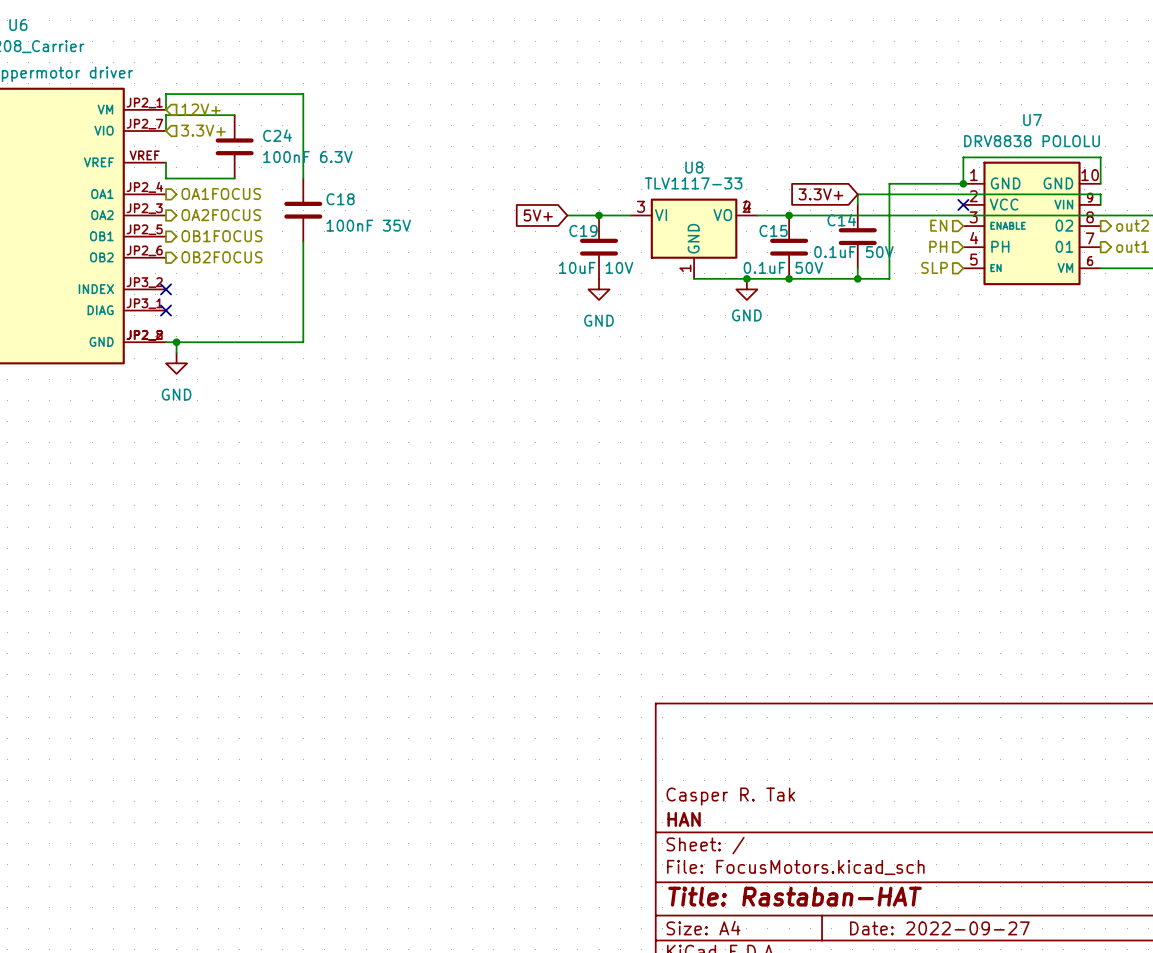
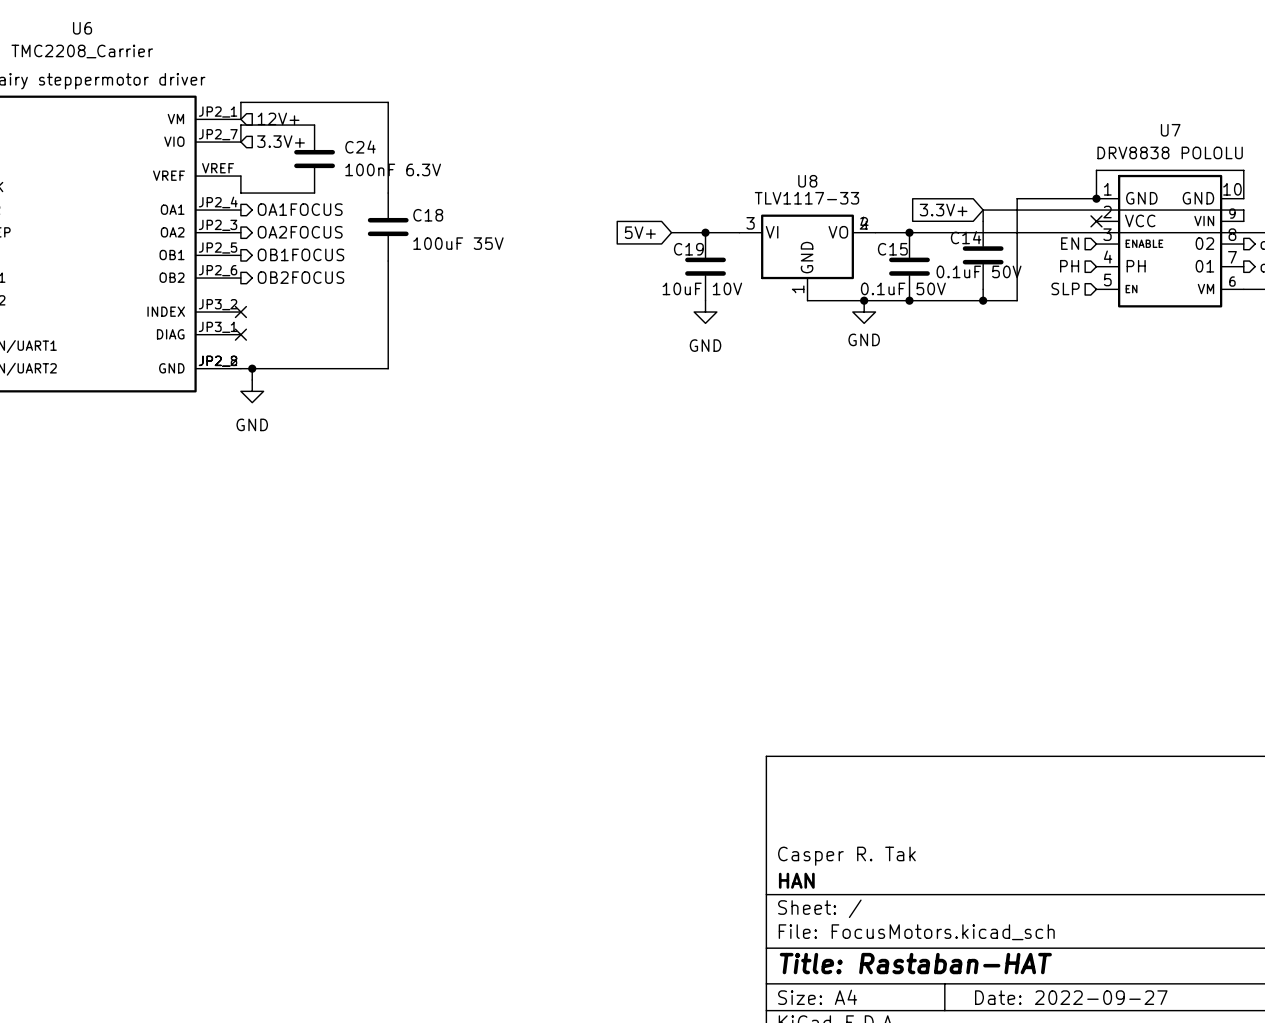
C18 value: 100nF 35V (368, 225) -> 100uF 35V (458, 243)

